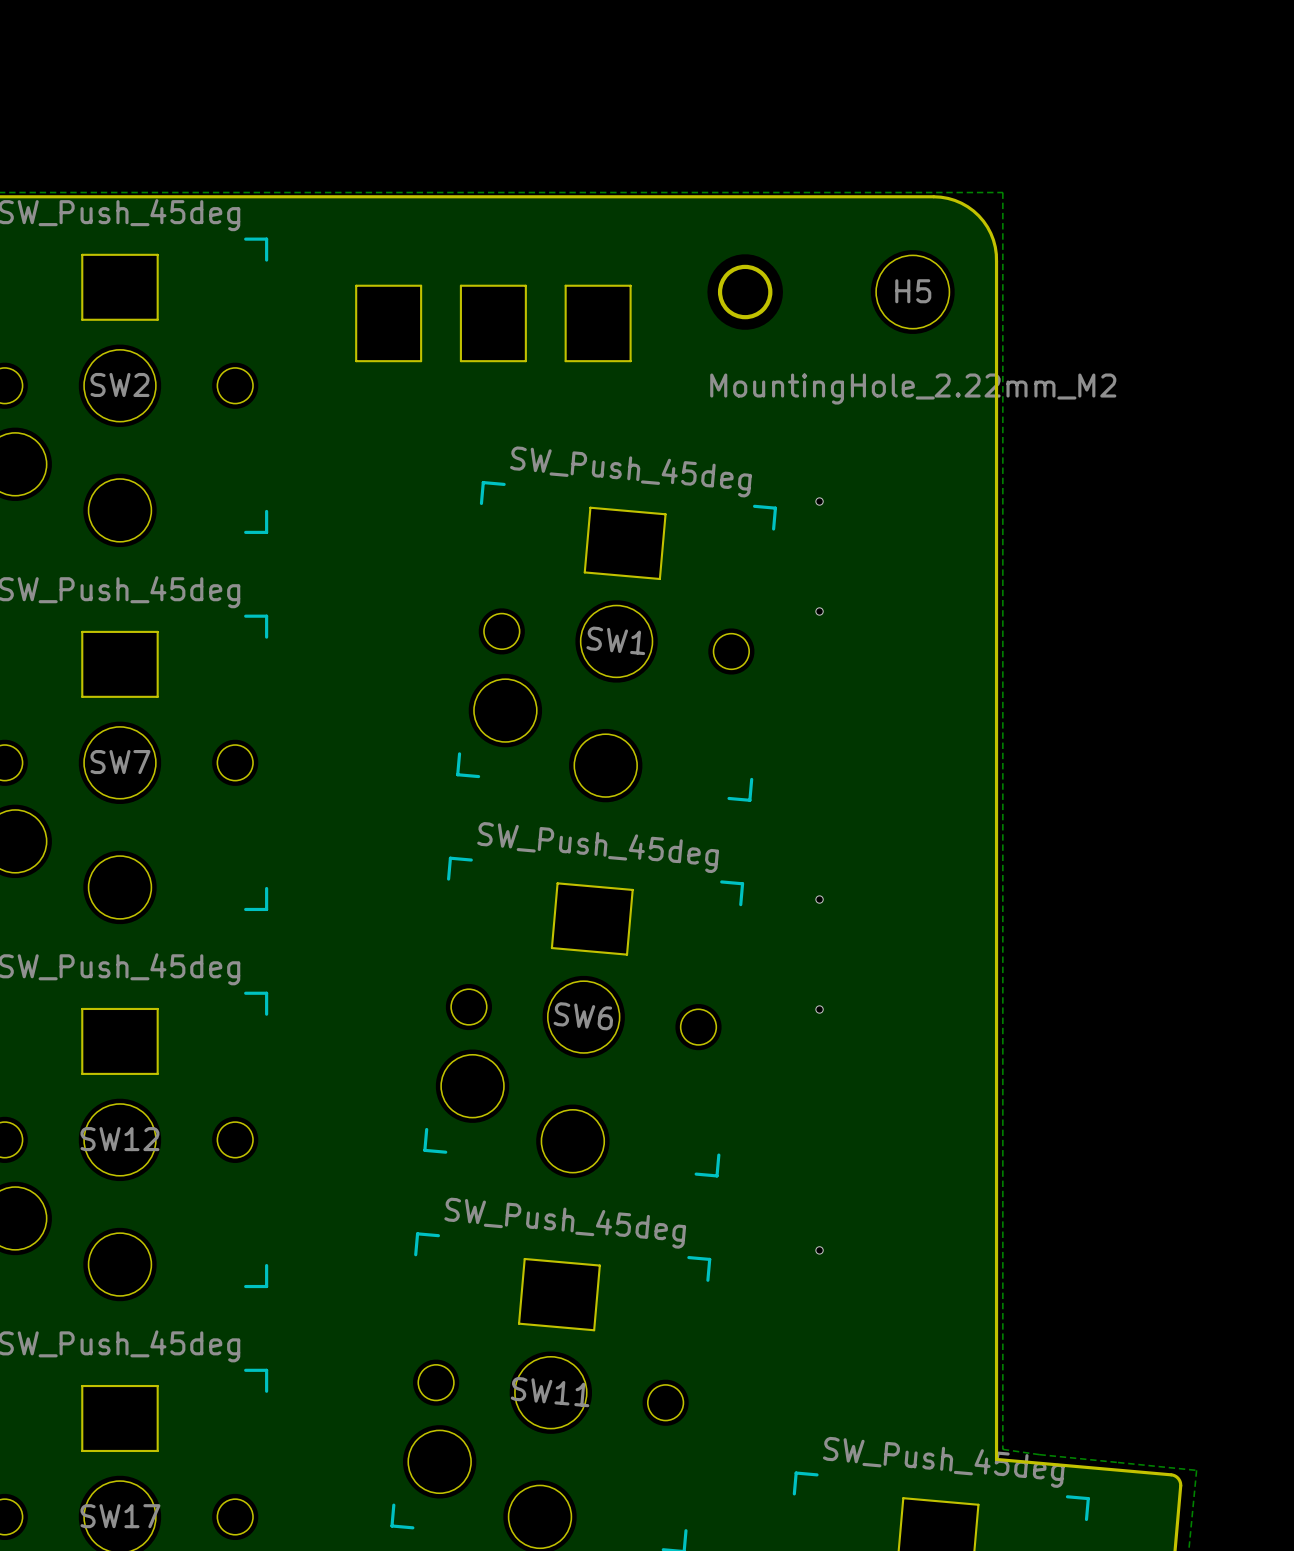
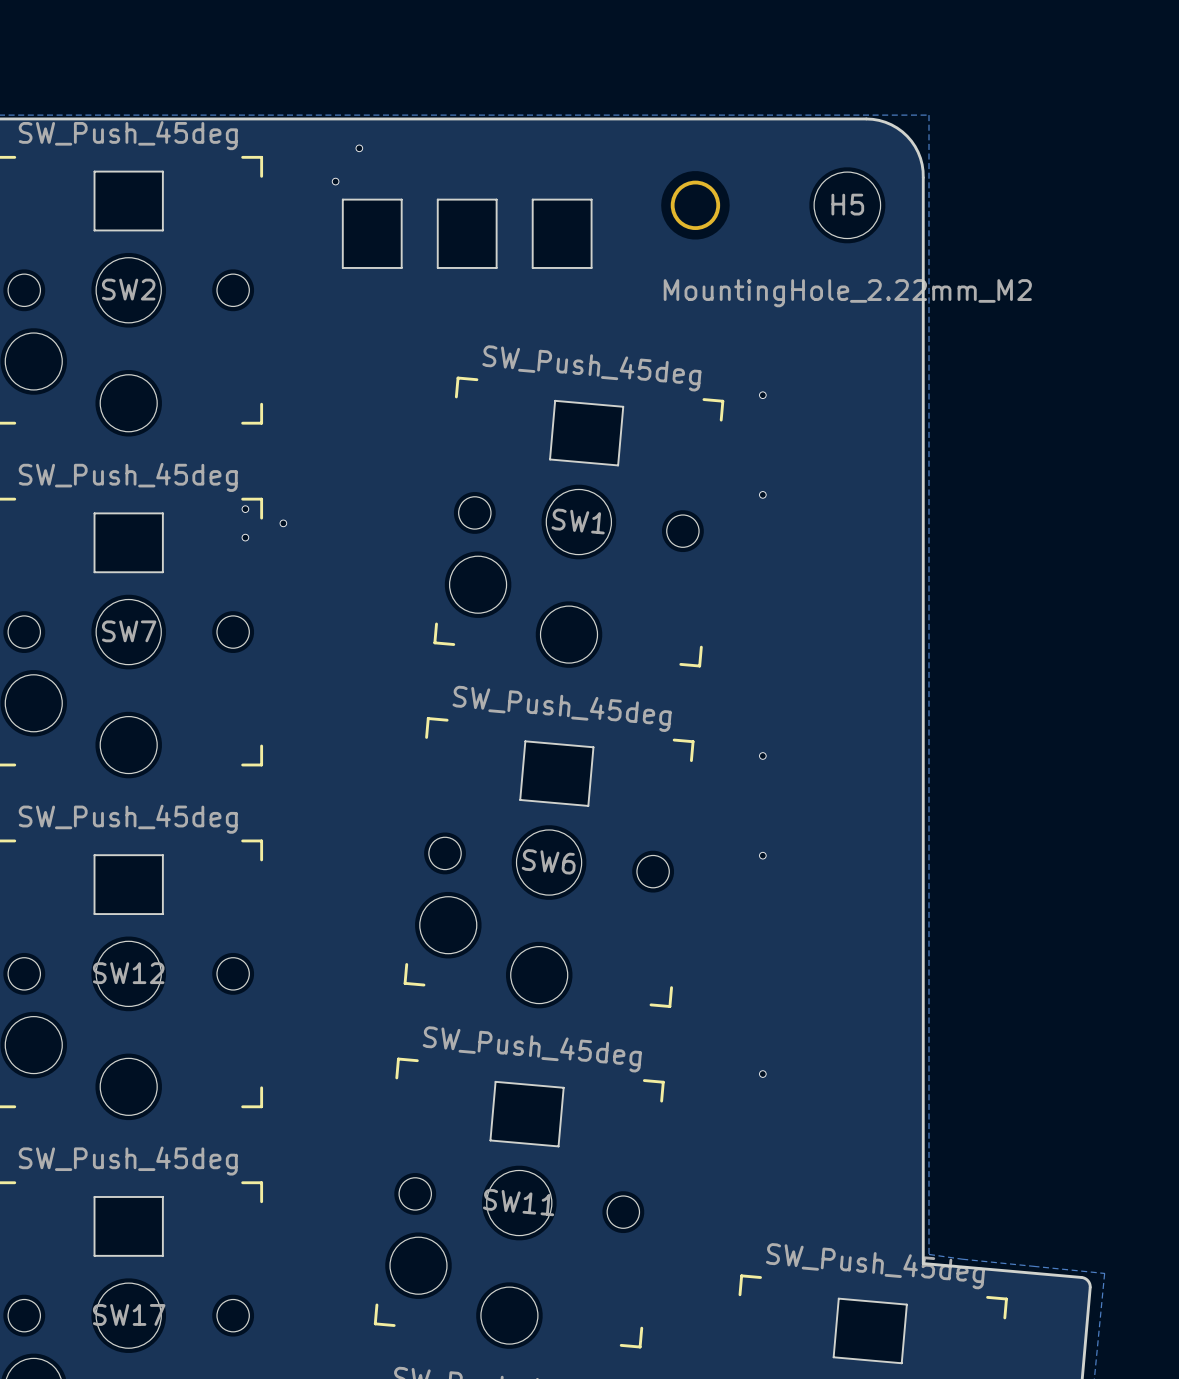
via: none -> (359, 148)
via: none -> (335, 181)
via: none -> (245, 509)
via: none -> (283, 523)
via: none -> (245, 537)

